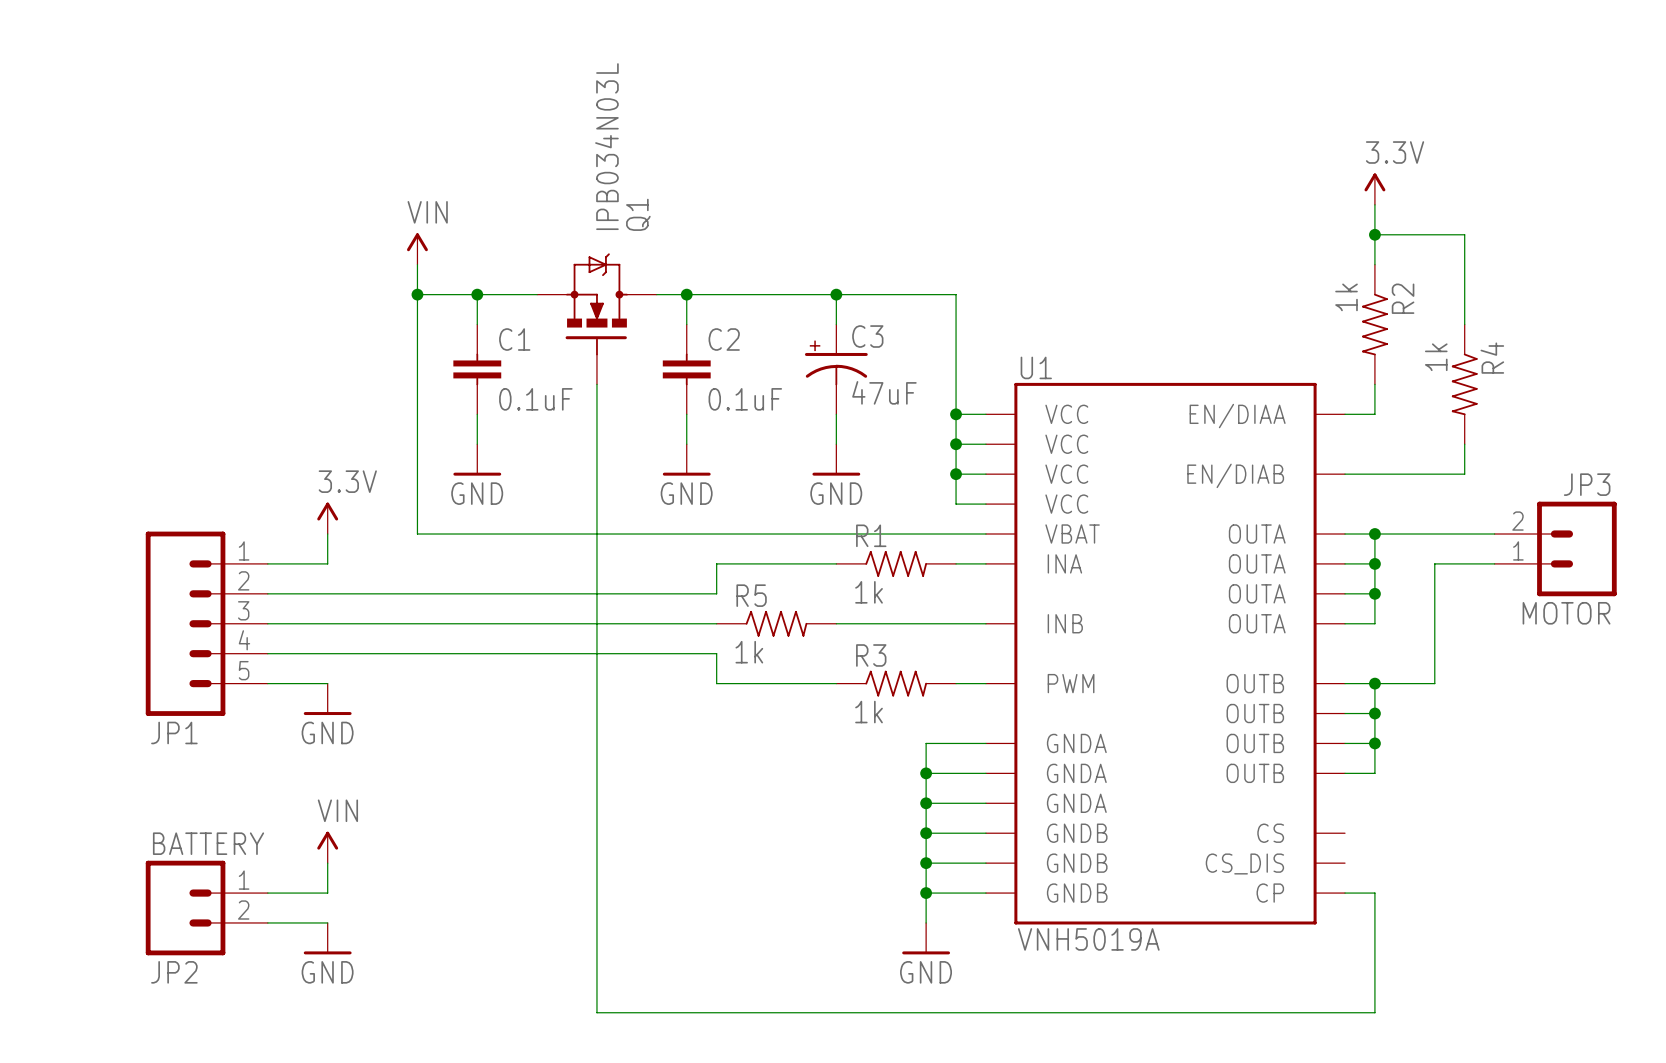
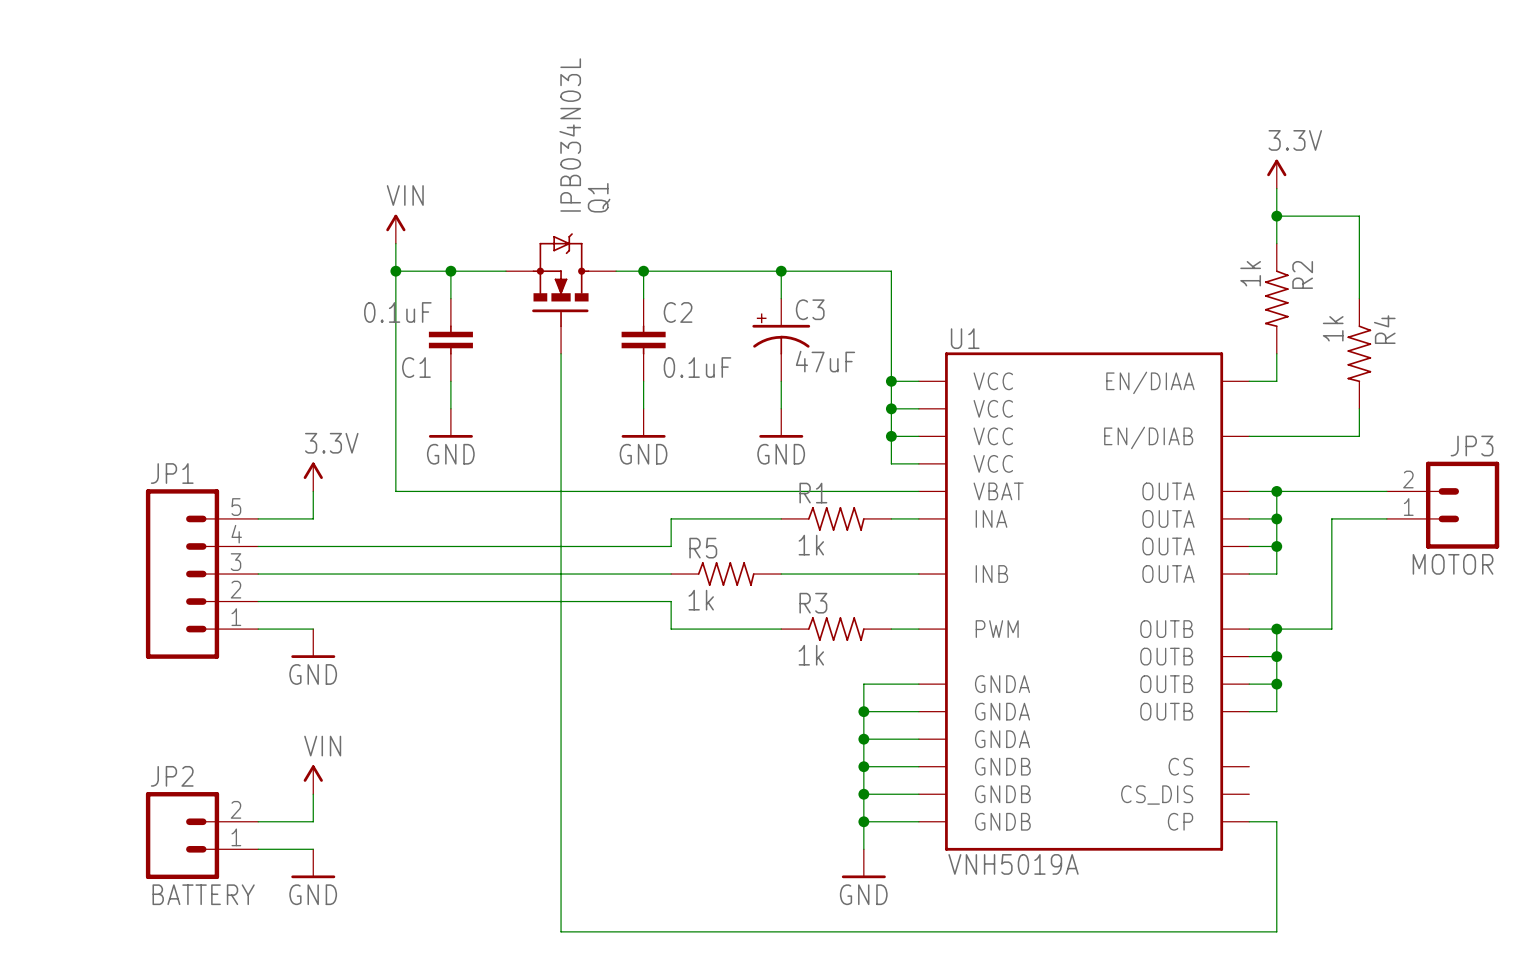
C1 name position: C1 (514, 339) -> C1 (416, 367)
C1 value position: 0.1uF (535, 399) -> 0.1uF (397, 312)
JP1 flip: as is (185, 623) -> up-down (182, 574)
JP2 flip: as is (185, 908) -> up-down (182, 835)

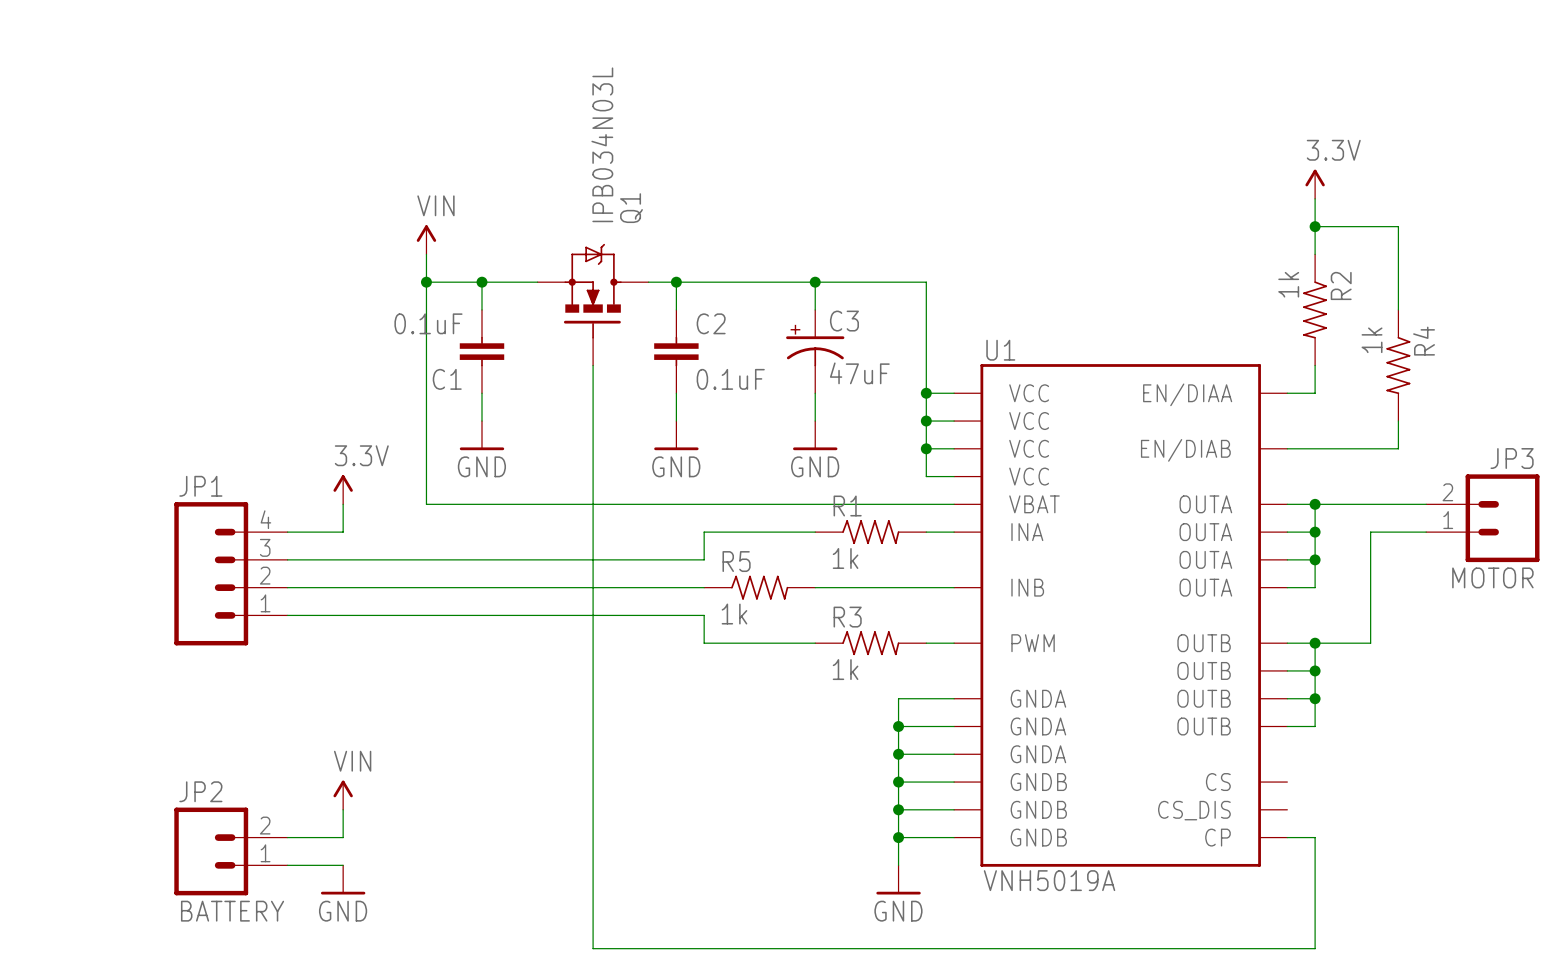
JP1 symbol: [145, 489, 259, 659] -> [174, 502, 288, 646]
wire: (258, 629) (313, 629) -> none
power symbol: GND (313, 643) -> none

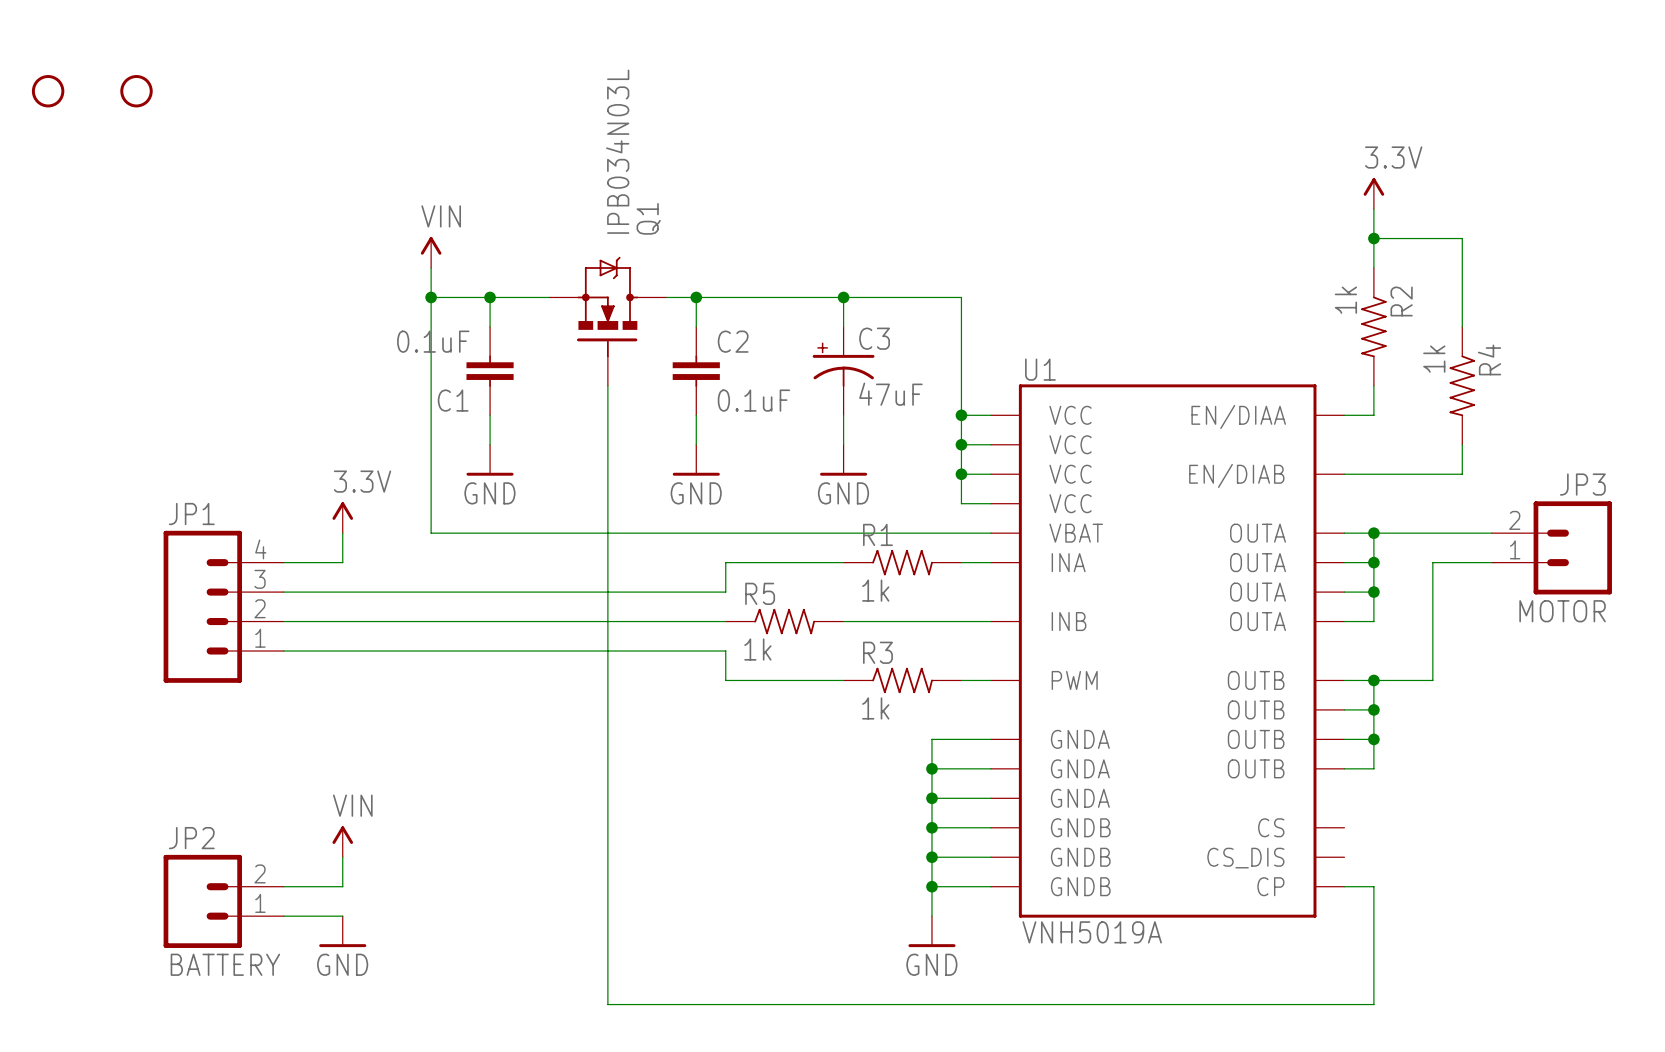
part: none -> (48, 91)
part: none -> (136, 91)

